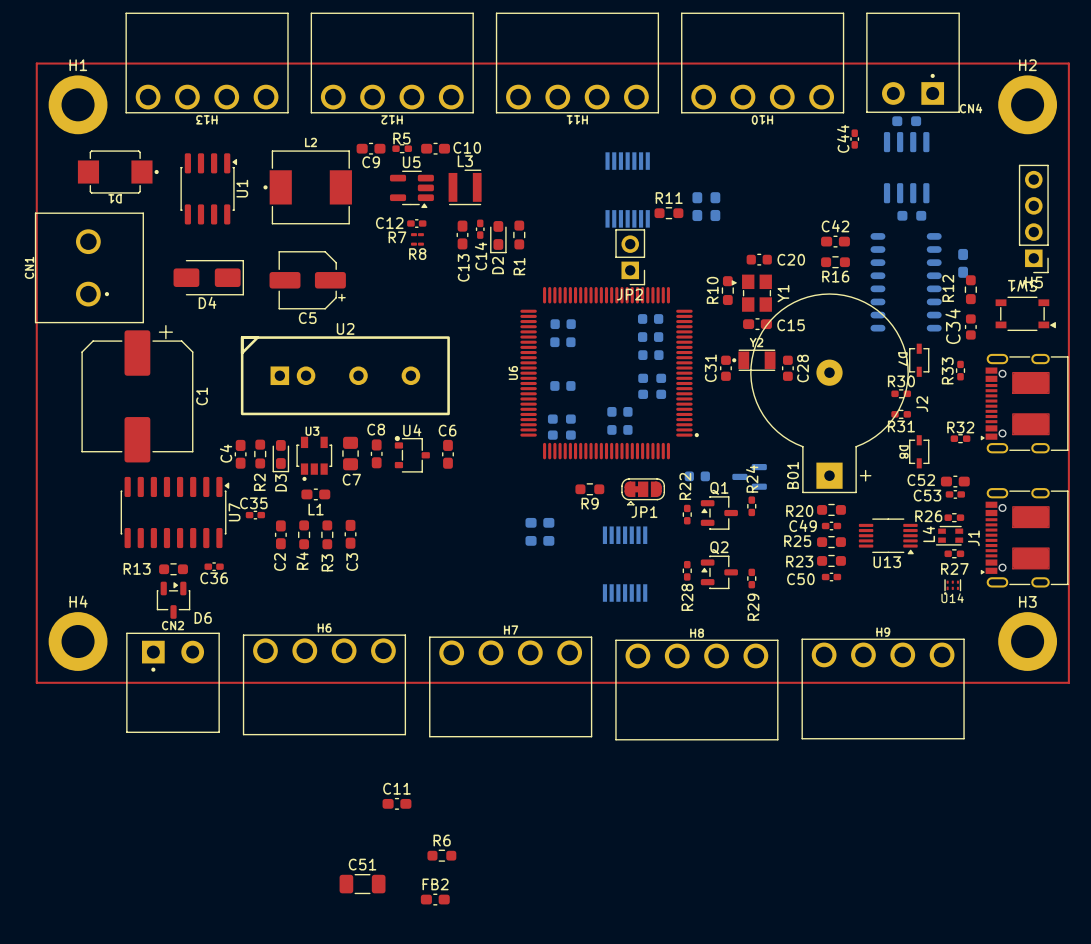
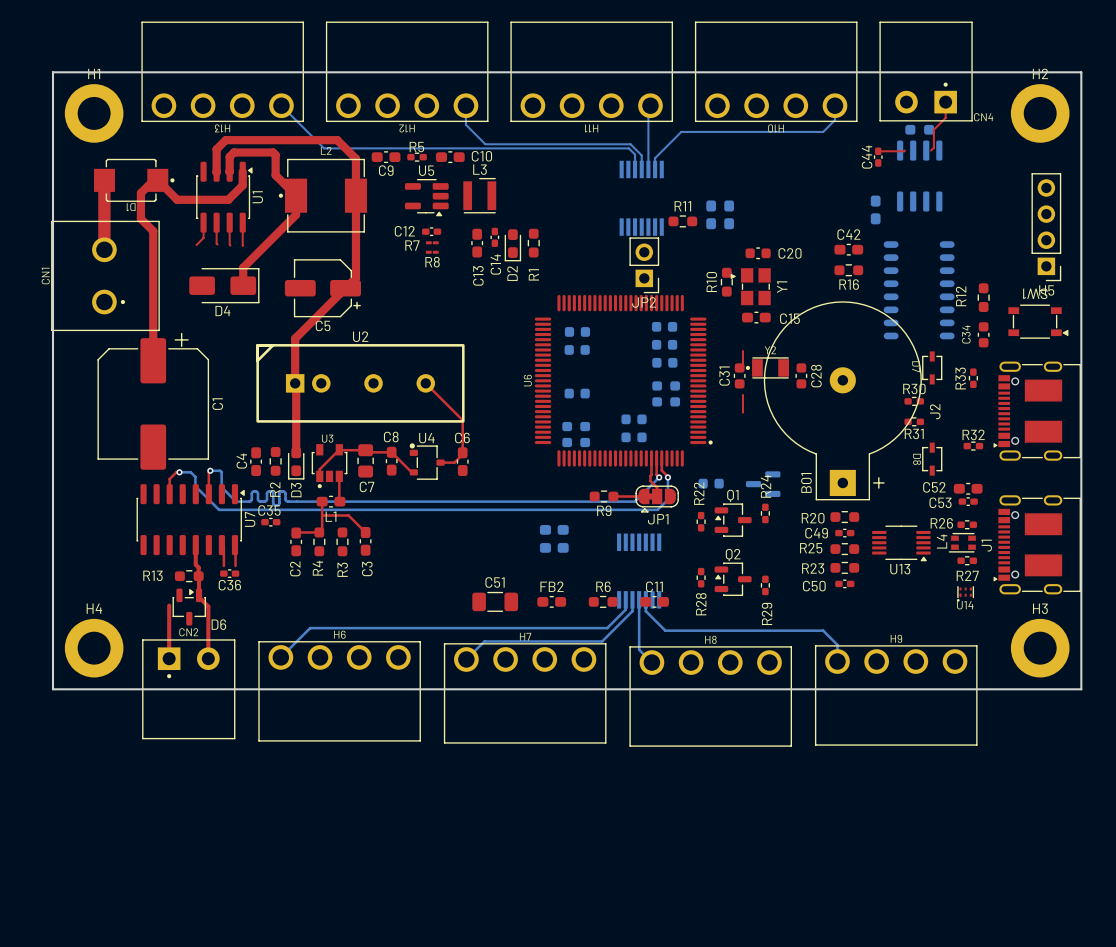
top track: (36, 63) (1068, 63) (1068, 682) (36, 682) (36, 63) -> none
board edge: none -> (53, 72) (1081, 72) (1081, 689) (53, 689) (53, 72)
top track: none -> (945, 102) (945, 118) (933, 129) (933, 147) (931, 150)
bottom track: none -> (281, 105) (324, 148) (628, 148) (635, 154) (635, 169)
bottom track: none -> (465, 105) (465, 124) (485, 144) (630, 144) (641, 155) (641, 169)
bottom track: none -> (650, 105) (648, 107) (648, 169)
bottom track: none -> (834, 105) (834, 120) (823, 131) (681, 131) (655, 158) (655, 169)
C44 position: (854, 139) -> (878, 157)
top track: none -> (904, 150) (878, 151)
top track: none -> (229, 172) (229, 156) (233, 152) (273, 152) (275, 155) (275, 175) (296, 195) (296, 214) (243, 267) (243, 285)
top track: none -> (242, 171) (242, 185) (228, 199) (177, 199) (157, 180) (153, 180) (140, 193) (140, 218) (153, 231) (153, 360)
top track: none -> (216, 172) (216, 149) (225, 140) (337, 140) (355, 158) (355, 277) (295, 338) (296, 452)
top track: none -> (104, 180) (104, 249)
top track: none -> (203, 222) (203, 237) (196, 245)
top track: none -> (216, 222) (217, 244)
top track: none -> (229, 222) (230, 245)
top track: none -> (242, 222) (242, 245)
part: (911, 215) -> none
C20 position: (759, 259) -> (758, 253)
part position: (963, 263) -> (875, 209)
R10 position: (727, 290) -> (726, 282)
Y1 position: (751, 293) -> (750, 286)
part footprint: [964, 314, 977, 340] -> [977, 322, 990, 348]
C15 position: (757, 324) -> (756, 317)
top track: none -> (742, 350) (742, 368)
top track: none -> (425, 383) (462, 420) (462, 454) (454, 462) (440, 462)
top track: none -> (742, 394) (742, 412)
top track: none -> (651, 458) (650, 481) (657, 487) (657, 496)
top track: none -> (656, 458) (656, 474) (659, 477)
top track: none -> (661, 458) (661, 470) (667, 477)
top track: none -> (210, 470) (208, 494)
bottom track: none -> (210, 470) (221, 472) (221, 487) (236, 501) (250, 501) (251, 492) (254, 491) (257, 492) (258, 500) (265, 501) (267, 492) (270, 491) (273, 493) (273, 503) (274, 505) (279, 504) (279, 493) (281, 491) (285, 492) (285, 499) (287, 501) (635, 501) (659, 477)
via: none -> (210, 470)
bottom track: none -> (179, 472) (190, 472) (195, 476) (195, 486) (219, 509) (657, 509) (667, 499) (667, 477)
via: none -> (179, 472)
top track: none -> (180, 472) (176, 472) (169, 479) (169, 494)
top track: none -> (413, 472) (391, 452) (339, 449) (319, 469) (319, 476)
top track: none -> (339, 476) (339, 501)
via: none -> (659, 477)
via: none -> (667, 477)
top track: none -> (613, 496) (643, 496)
top track: none -> (322, 501) (322, 529) (319, 532) (296, 532)
top track: none -> (322, 515) (348, 515) (365, 532)
top track: none -> (195, 545) (199, 597) (208, 606) (208, 658)
top track: none -> (221, 545) (223, 547) (223, 565)
top track: none -> (234, 545) (235, 565)
bottom track: none -> (625, 599) (625, 609) (607, 628) (310, 628) (280, 657)
bottom track: none -> (632, 599) (632, 611) (602, 641) (484, 641) (466, 659)
bottom track: none -> (639, 599) (639, 649) (651, 662)
bottom track: none -> (645, 599) (645, 611) (665, 630) (823, 630) (837, 645) (837, 661)
top track: none -> (169, 605) (169, 658)
C11 position: (396, 803) -> (654, 601)
R6 position: (441, 855) -> (603, 601)
C51 position: (362, 884) -> (495, 601)
FB2 position: (435, 899) -> (551, 601)

